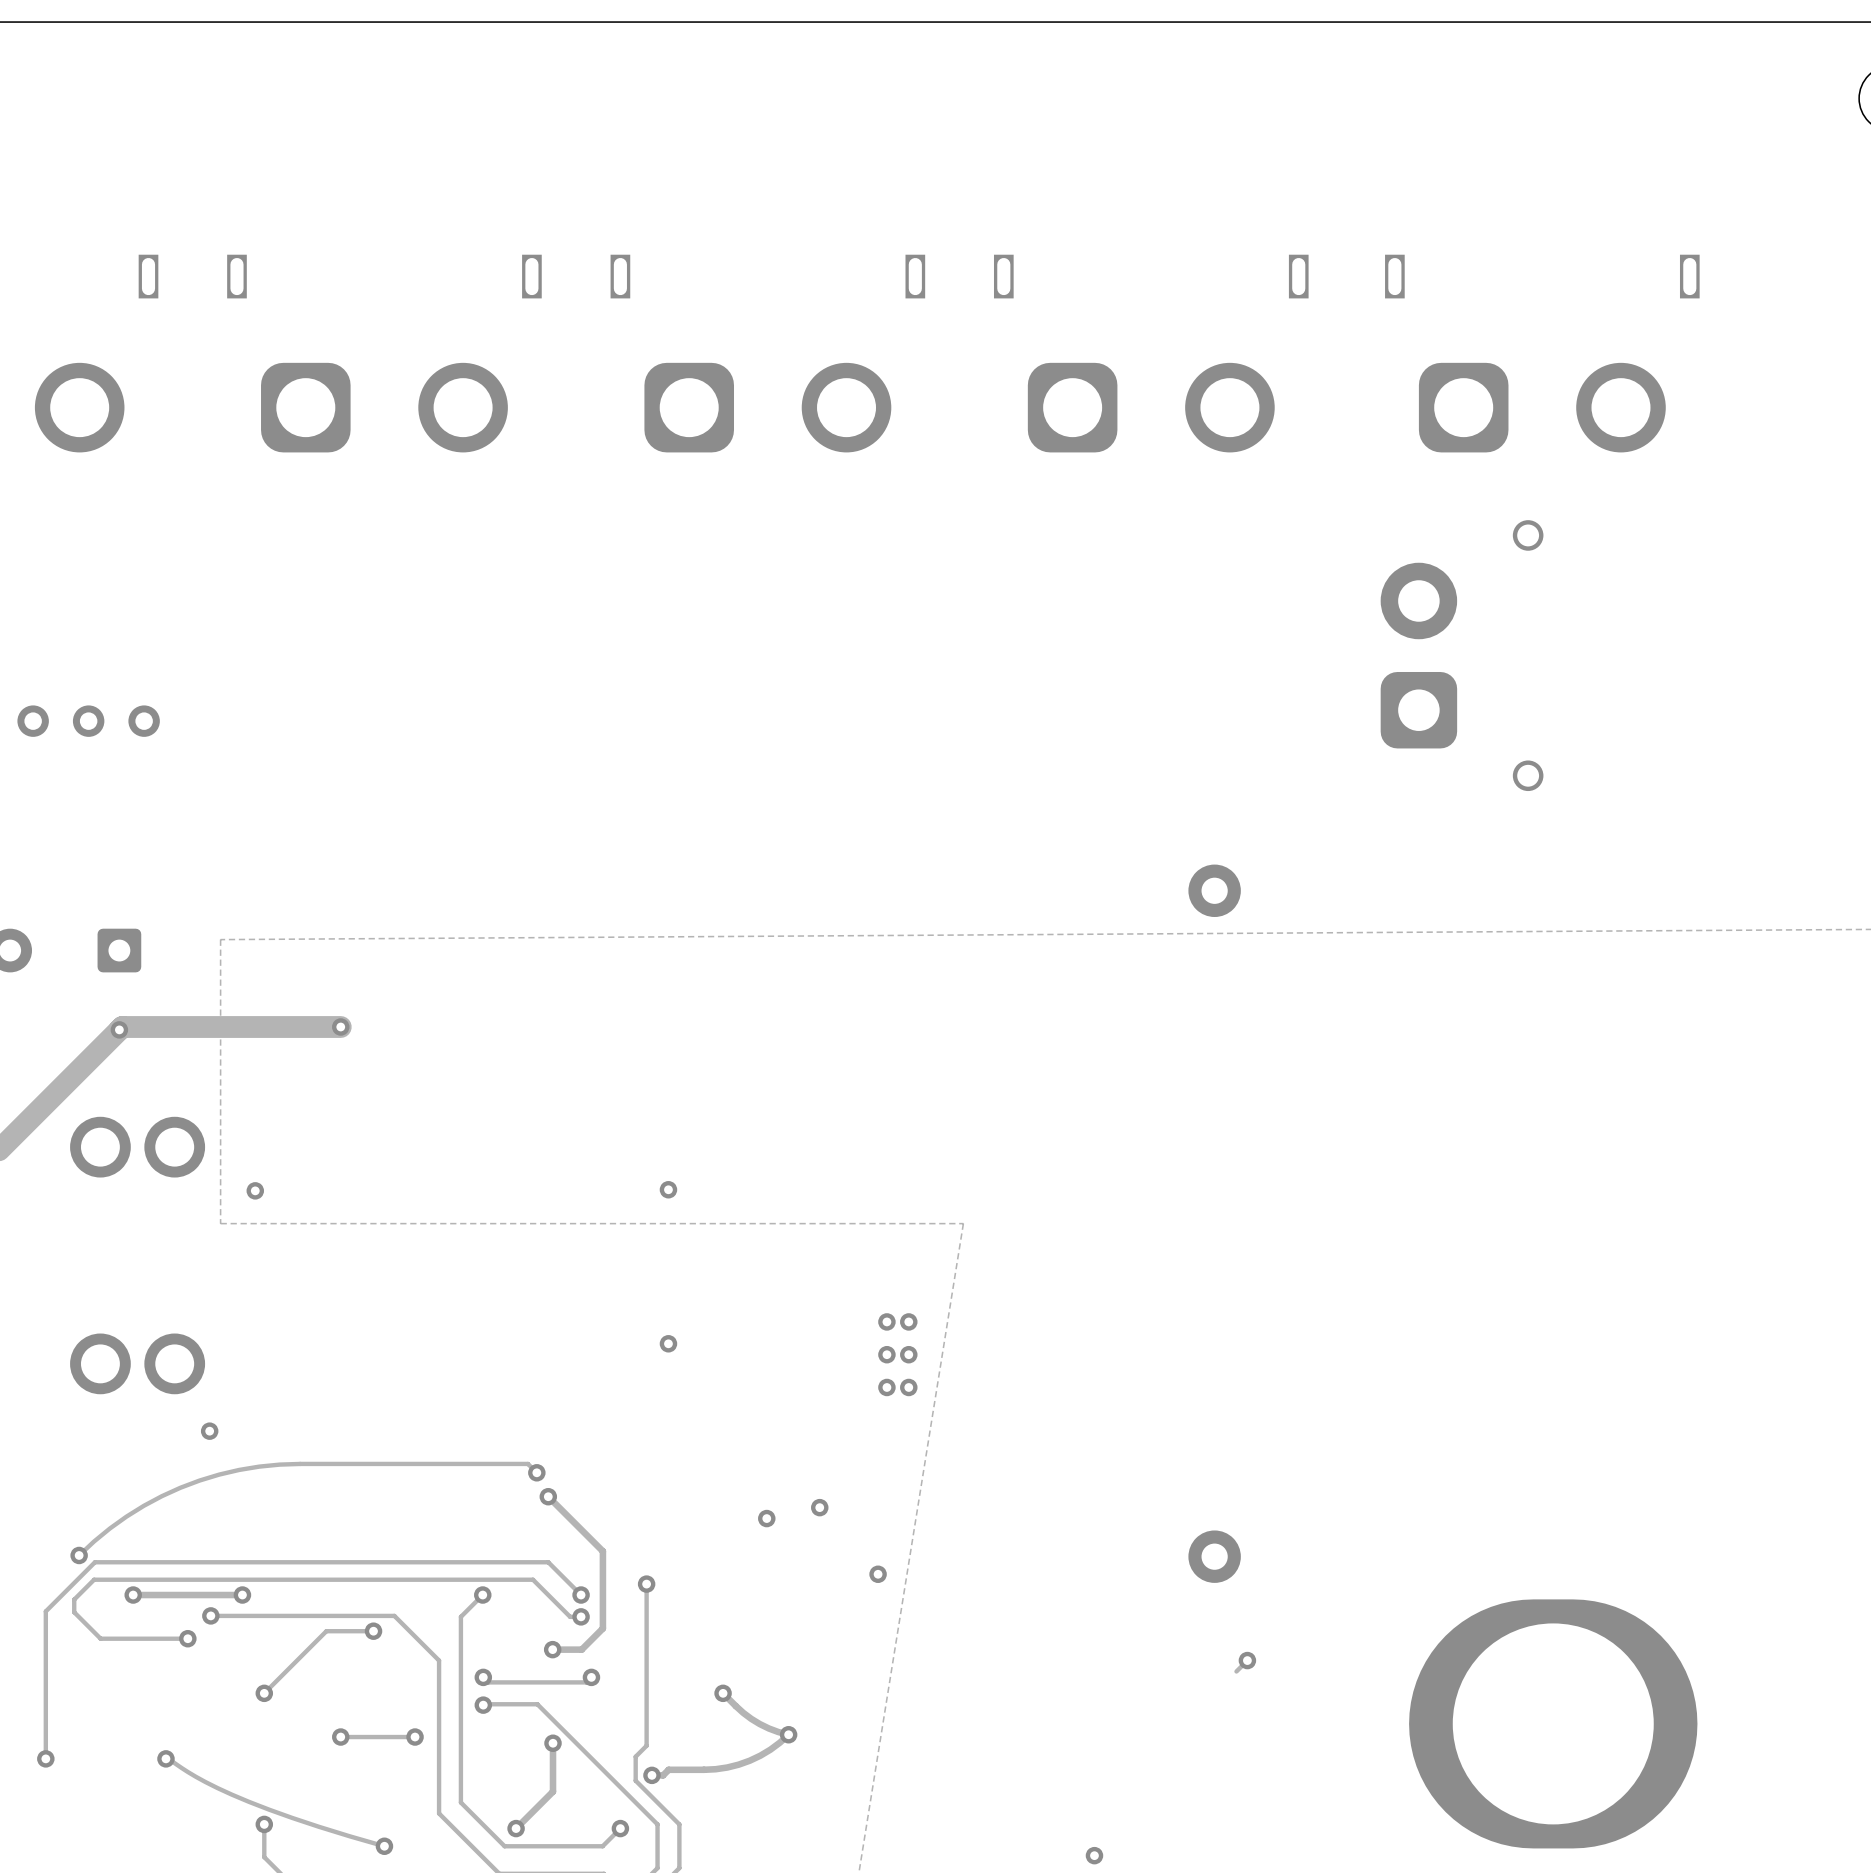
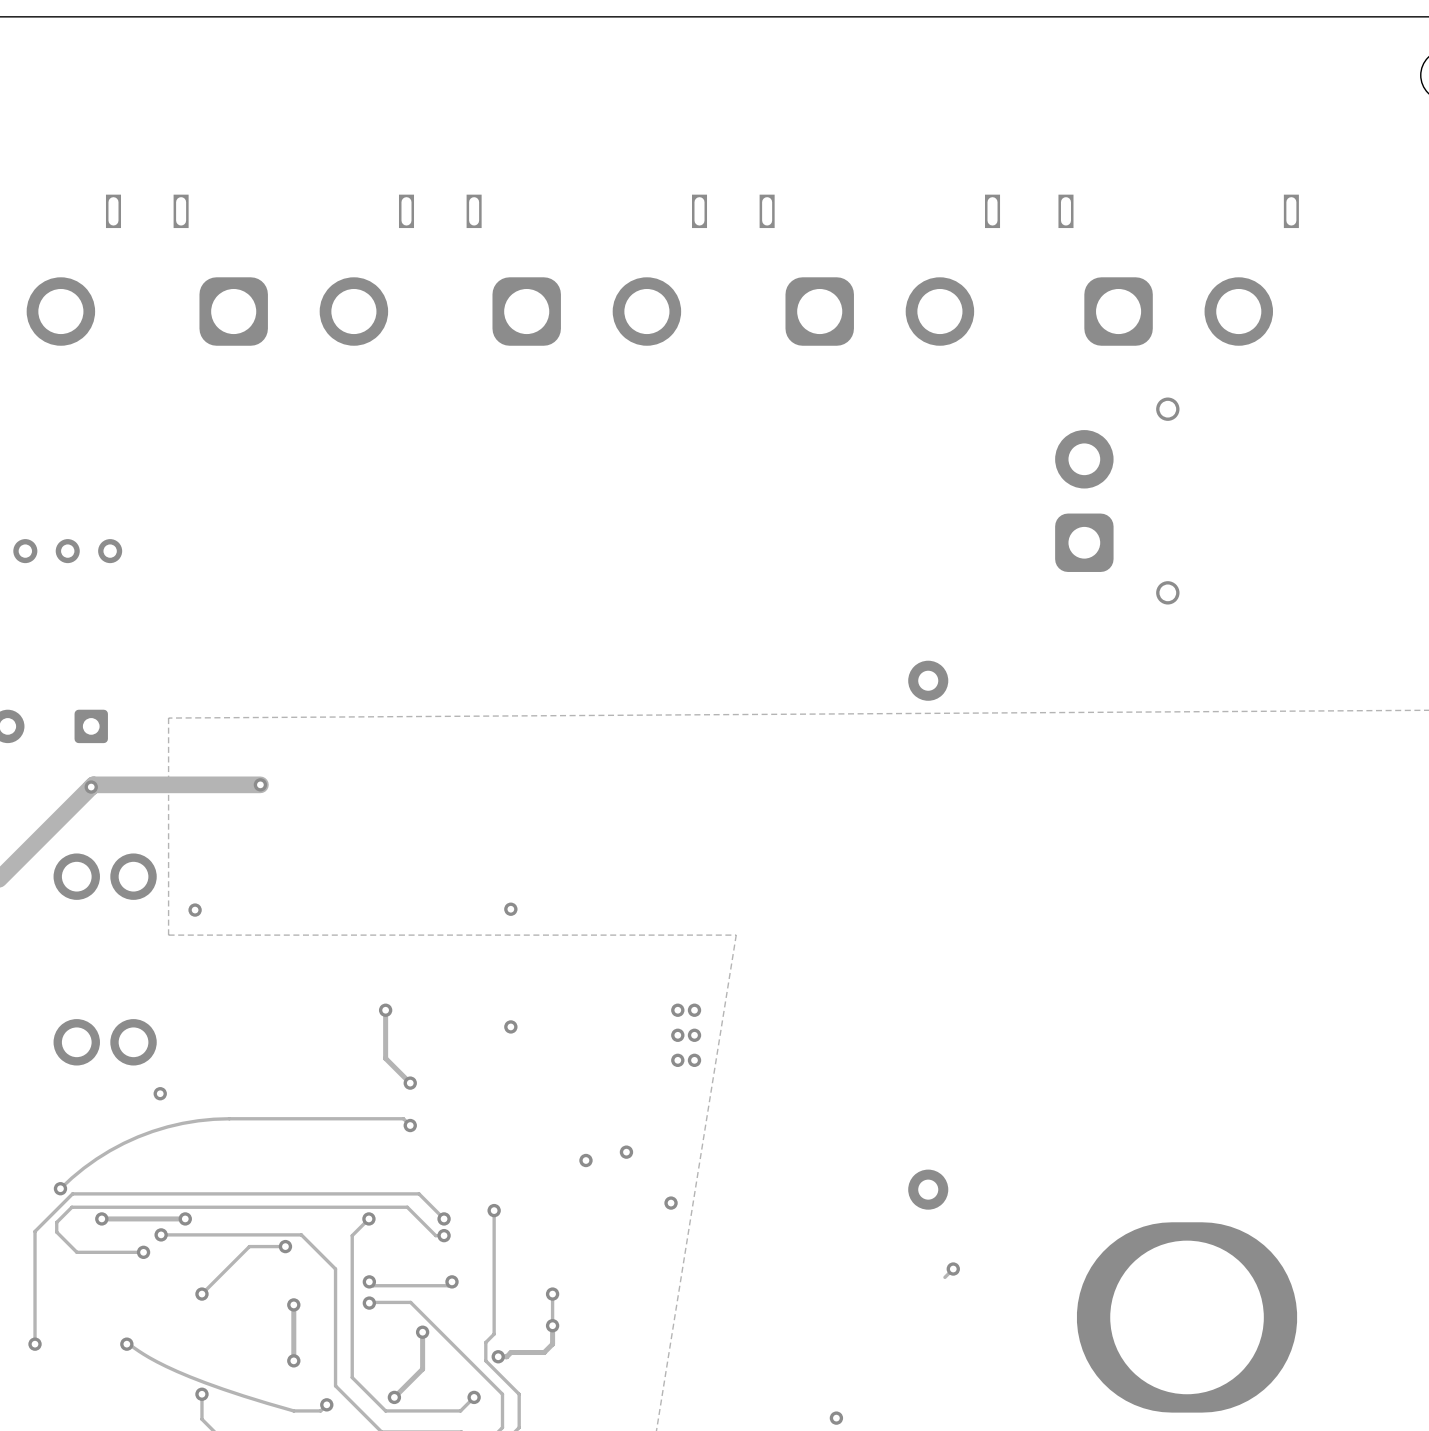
track: none -> (385, 1010) (385, 1058) (410, 1083)
via: none -> (385, 1010)
track: (548, 1496) (602, 1551) (602, 1628) (581, 1649) (552, 1649) -> none
via position: (548, 1496) -> (410, 1083)
via: (552, 1649) -> none
track: (723, 1693) (751, 1718) (768, 1728) (788, 1734) -> none
track: none -> (293, 1304) (293, 1360)
via: none -> (293, 1304)
track: (788, 1734) (770, 1749) (749, 1760) (727, 1767) (703, 1769) -> (552, 1294) (552, 1344) (544, 1352) (537, 1352)
via position: (788, 1734) -> (552, 1325)
via: (340, 1737) -> none
track: (415, 1737) (340, 1737) -> none
via: (415, 1737) -> none
via: none -> (293, 1360)
track: none -> (326, 1404) (320, 1410) (293, 1410)
via: none -> (326, 1404)
via: (384, 1846) -> none

